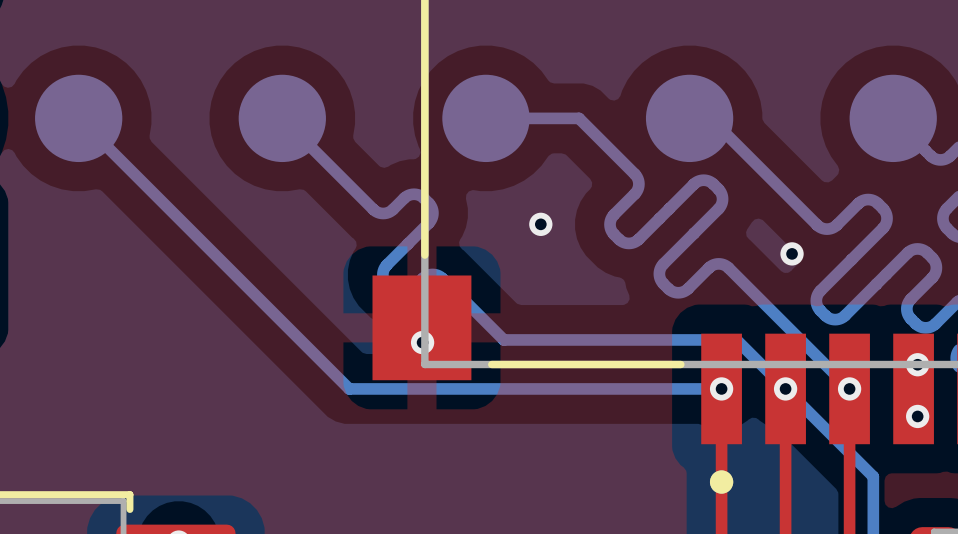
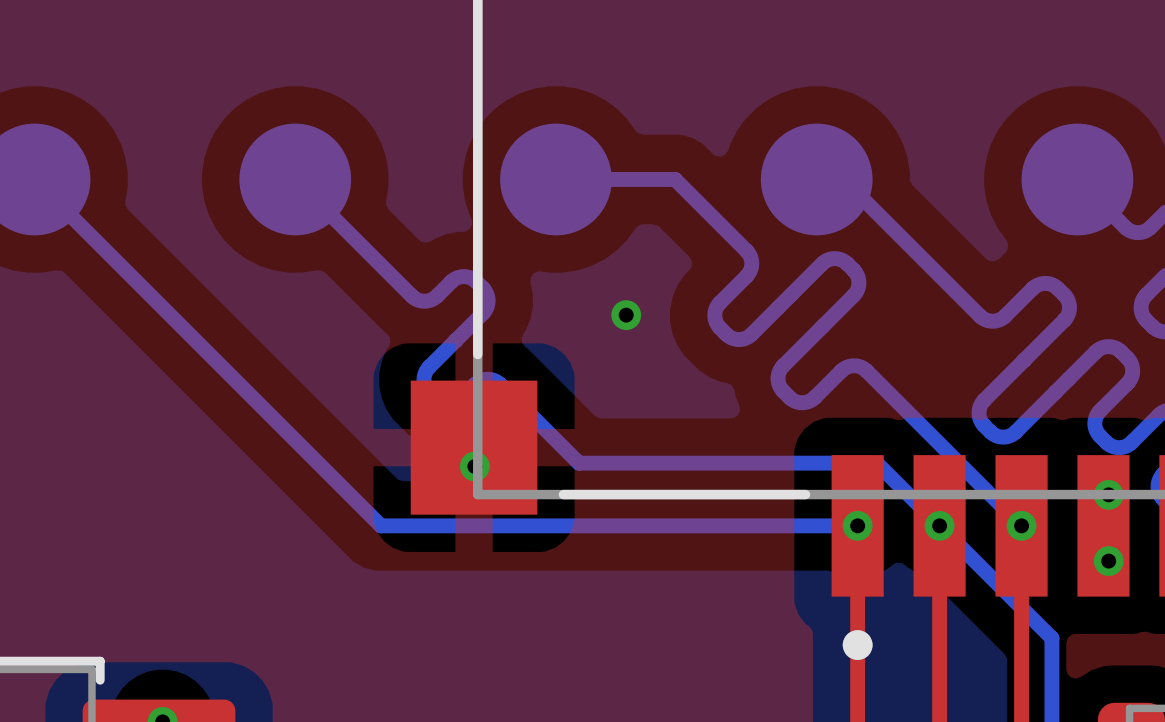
via: (792, 253) -> none

